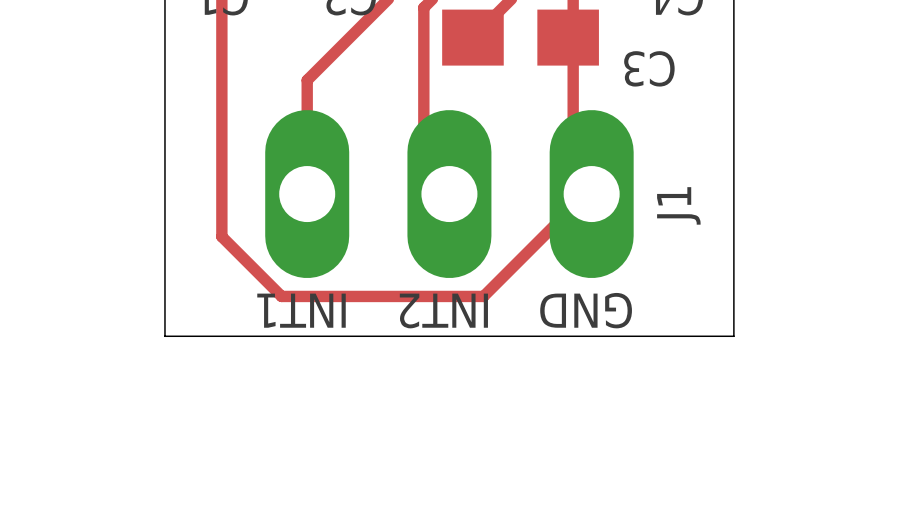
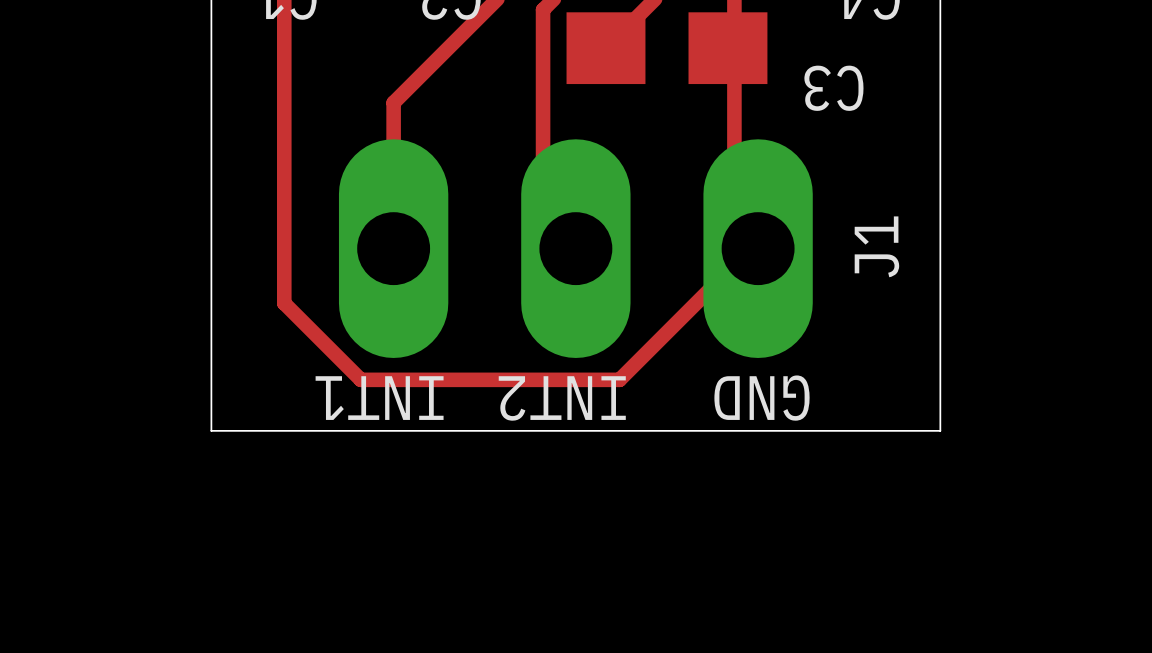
part: (449, 194) -> none
J1: none -> (575, 248)
text: J1 (678, 205) -> none

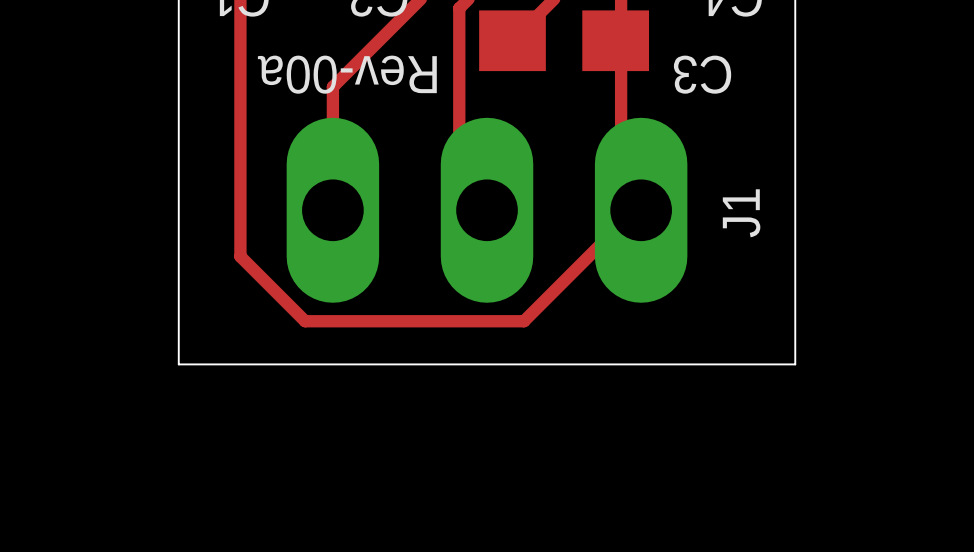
text: none -> Rev-00a (347, 74)
text: INT1 (379, 398) -> none
text: INT2 (562, 398) -> none
text: GND (762, 398) -> none

